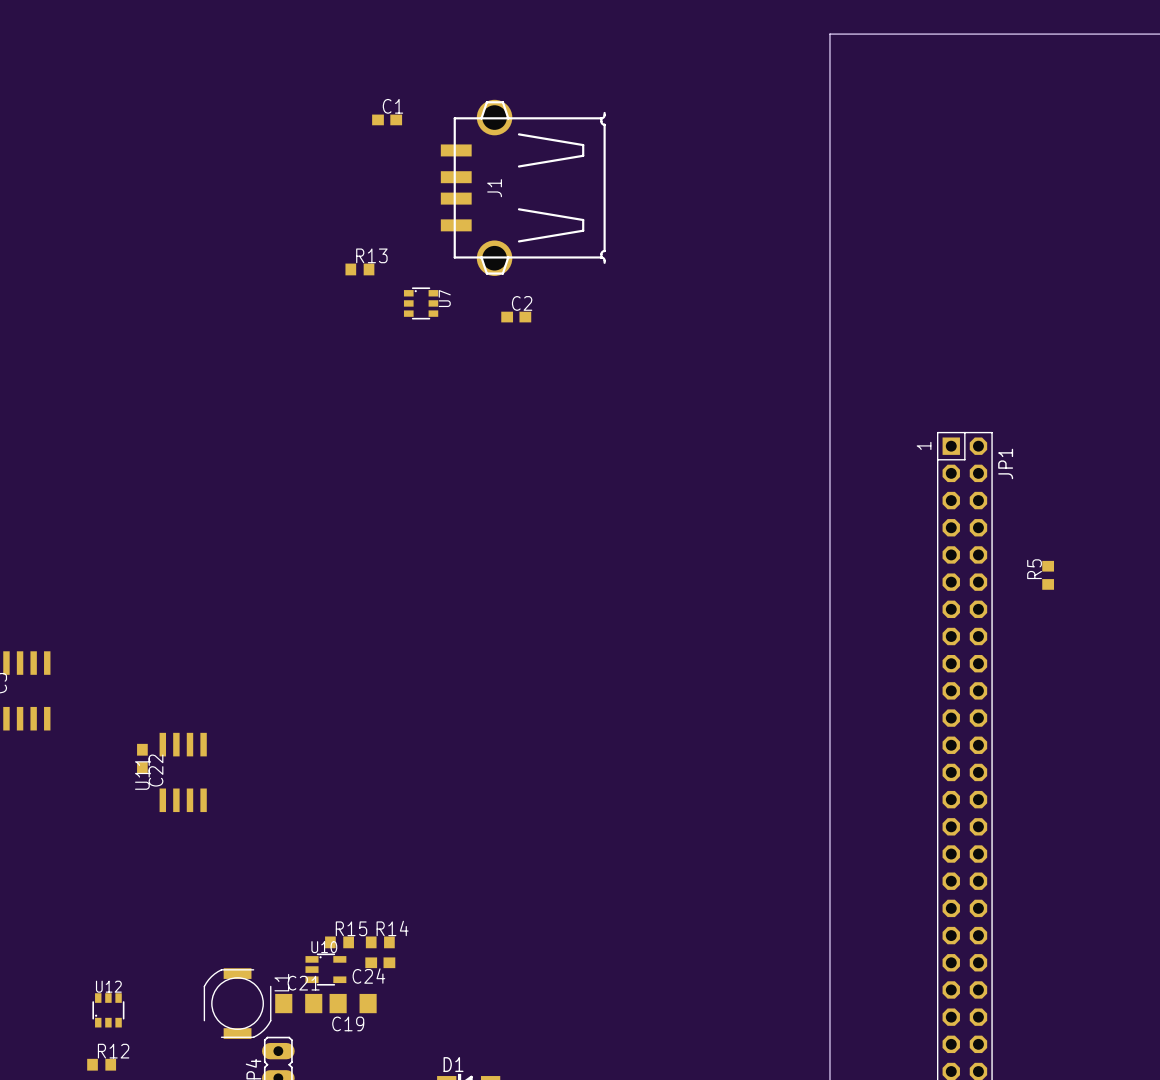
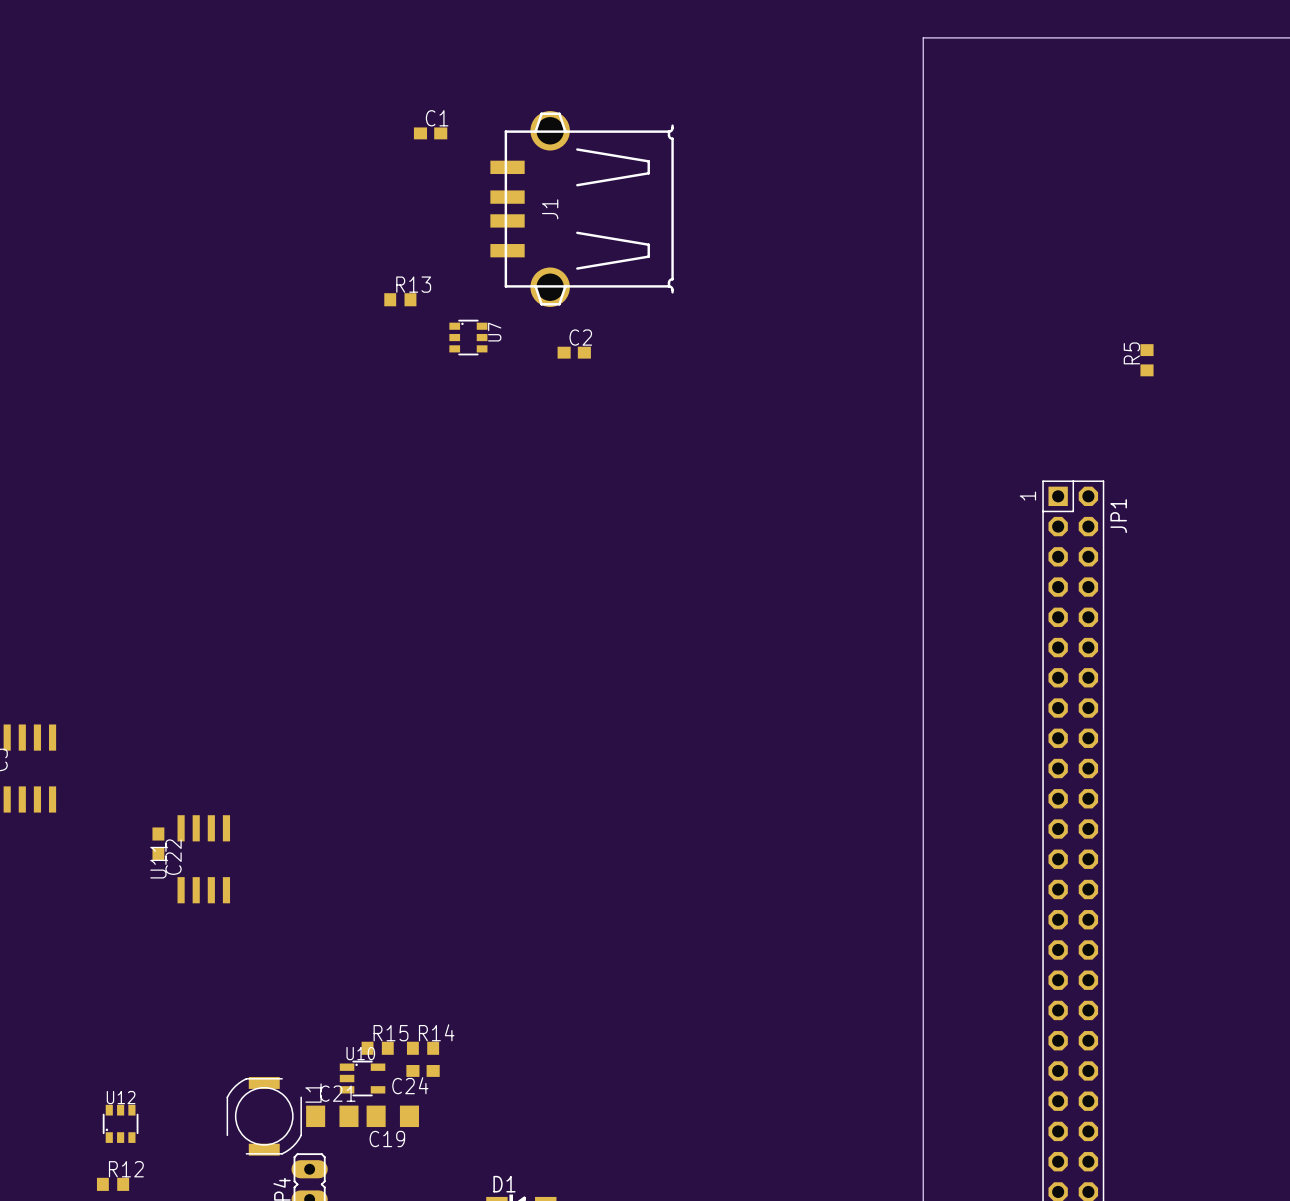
R5 position: (1048, 575) -> (1147, 360)

